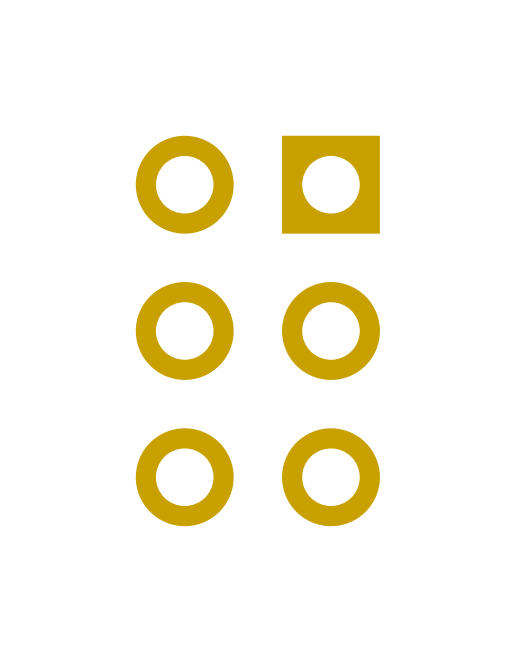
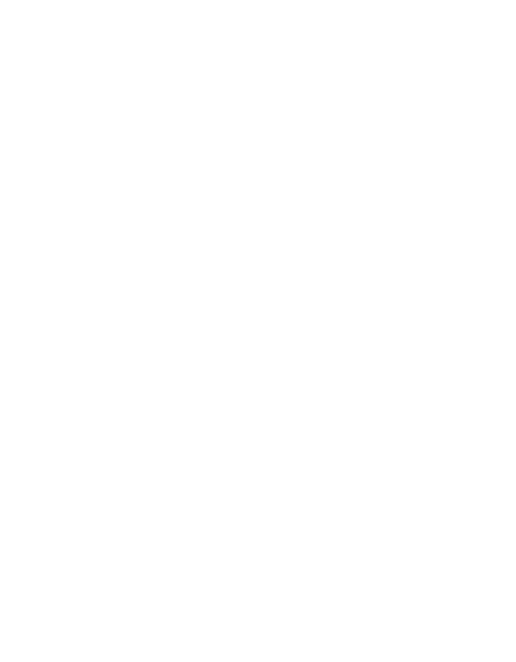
part: (257, 330) -> none

